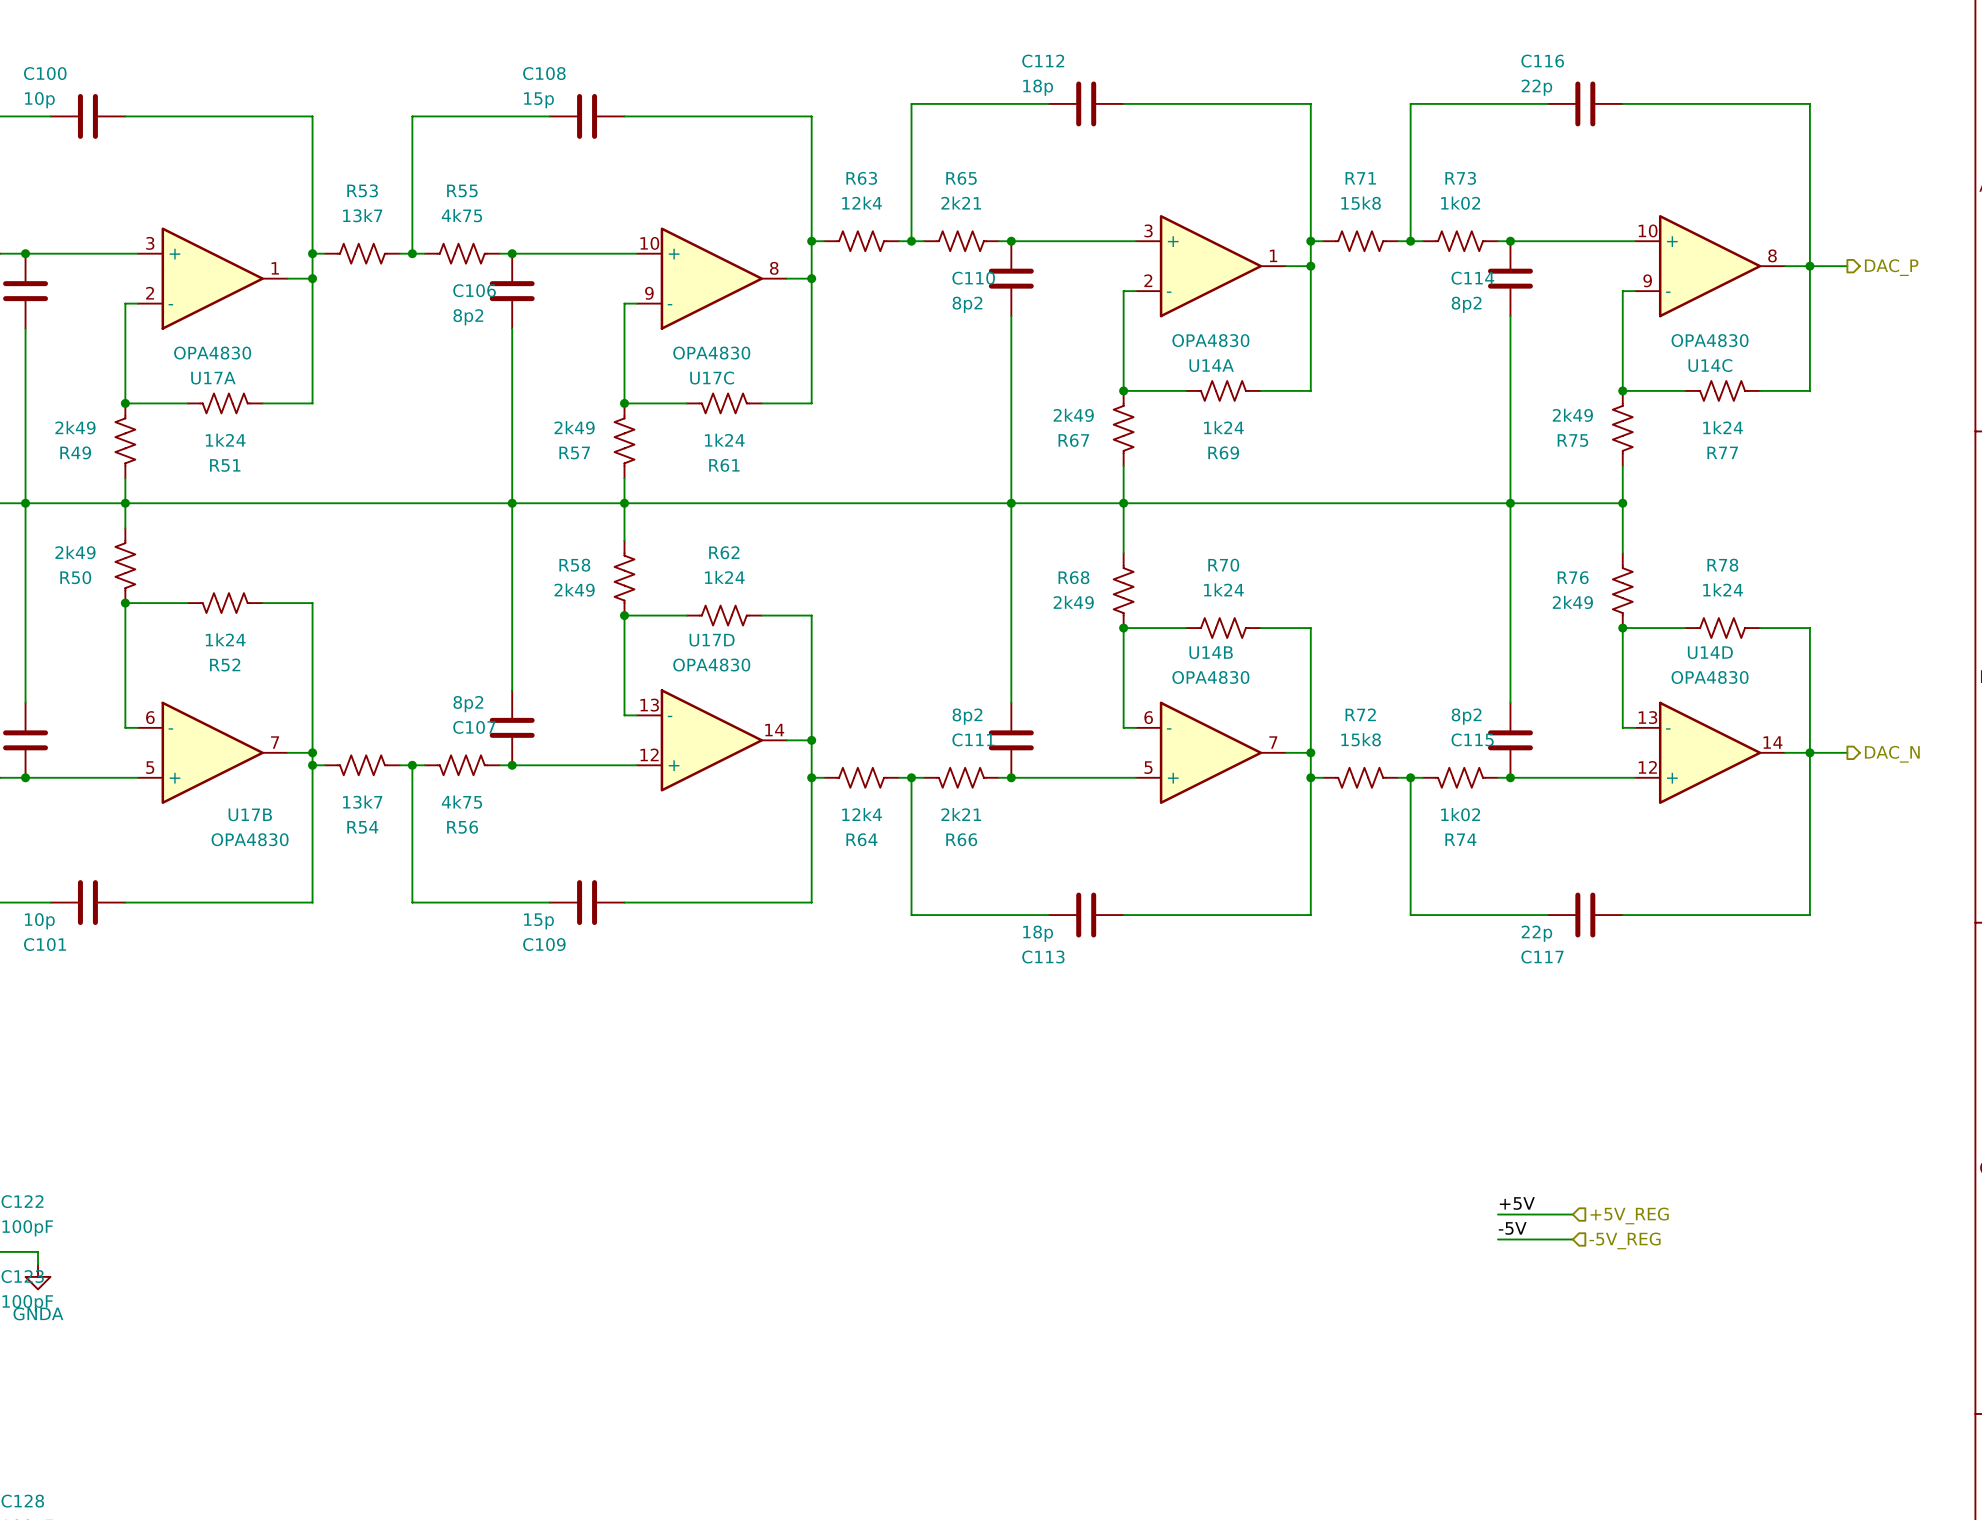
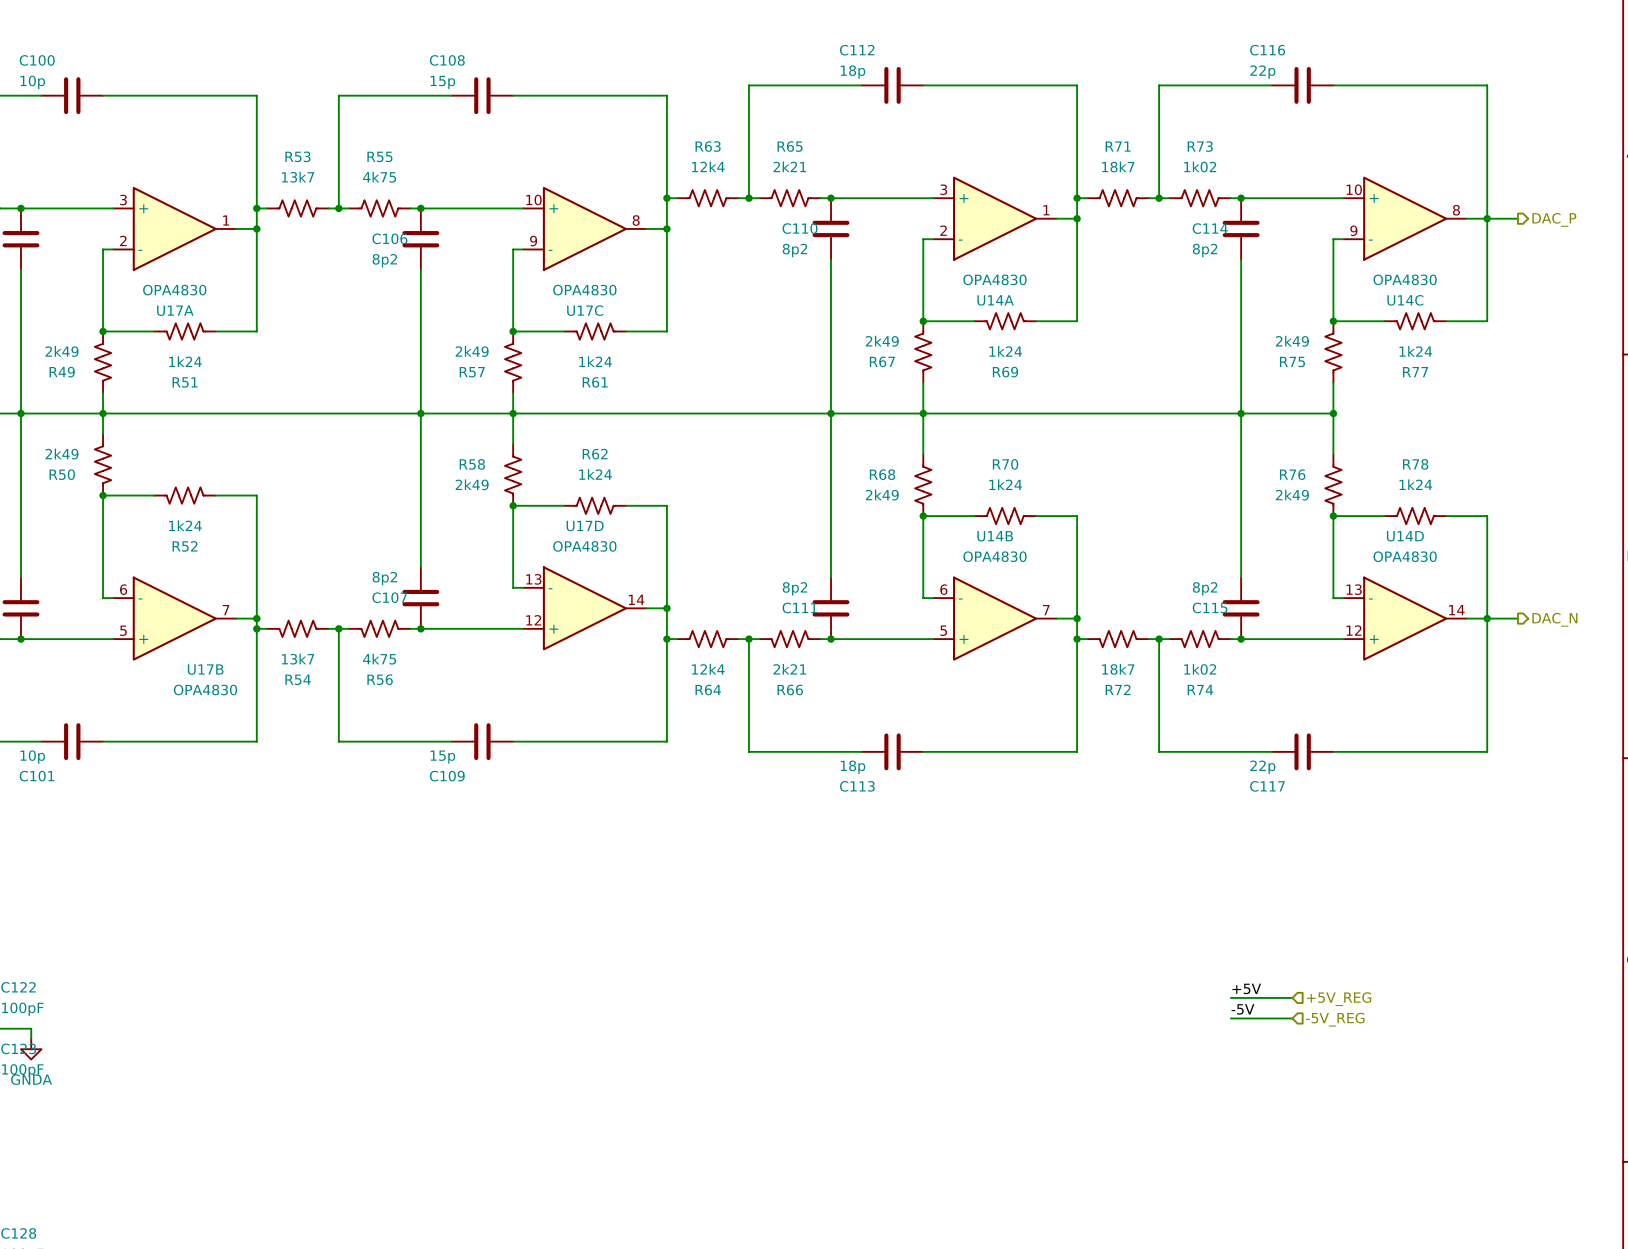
R71 value: 15k8 (1361, 203) -> 18k7 (1118, 166)
R72 name position: R72 (1360, 714) -> R72 (1118, 689)
R72 value: 15k8 (1361, 739) -> 18k7 (1118, 669)

